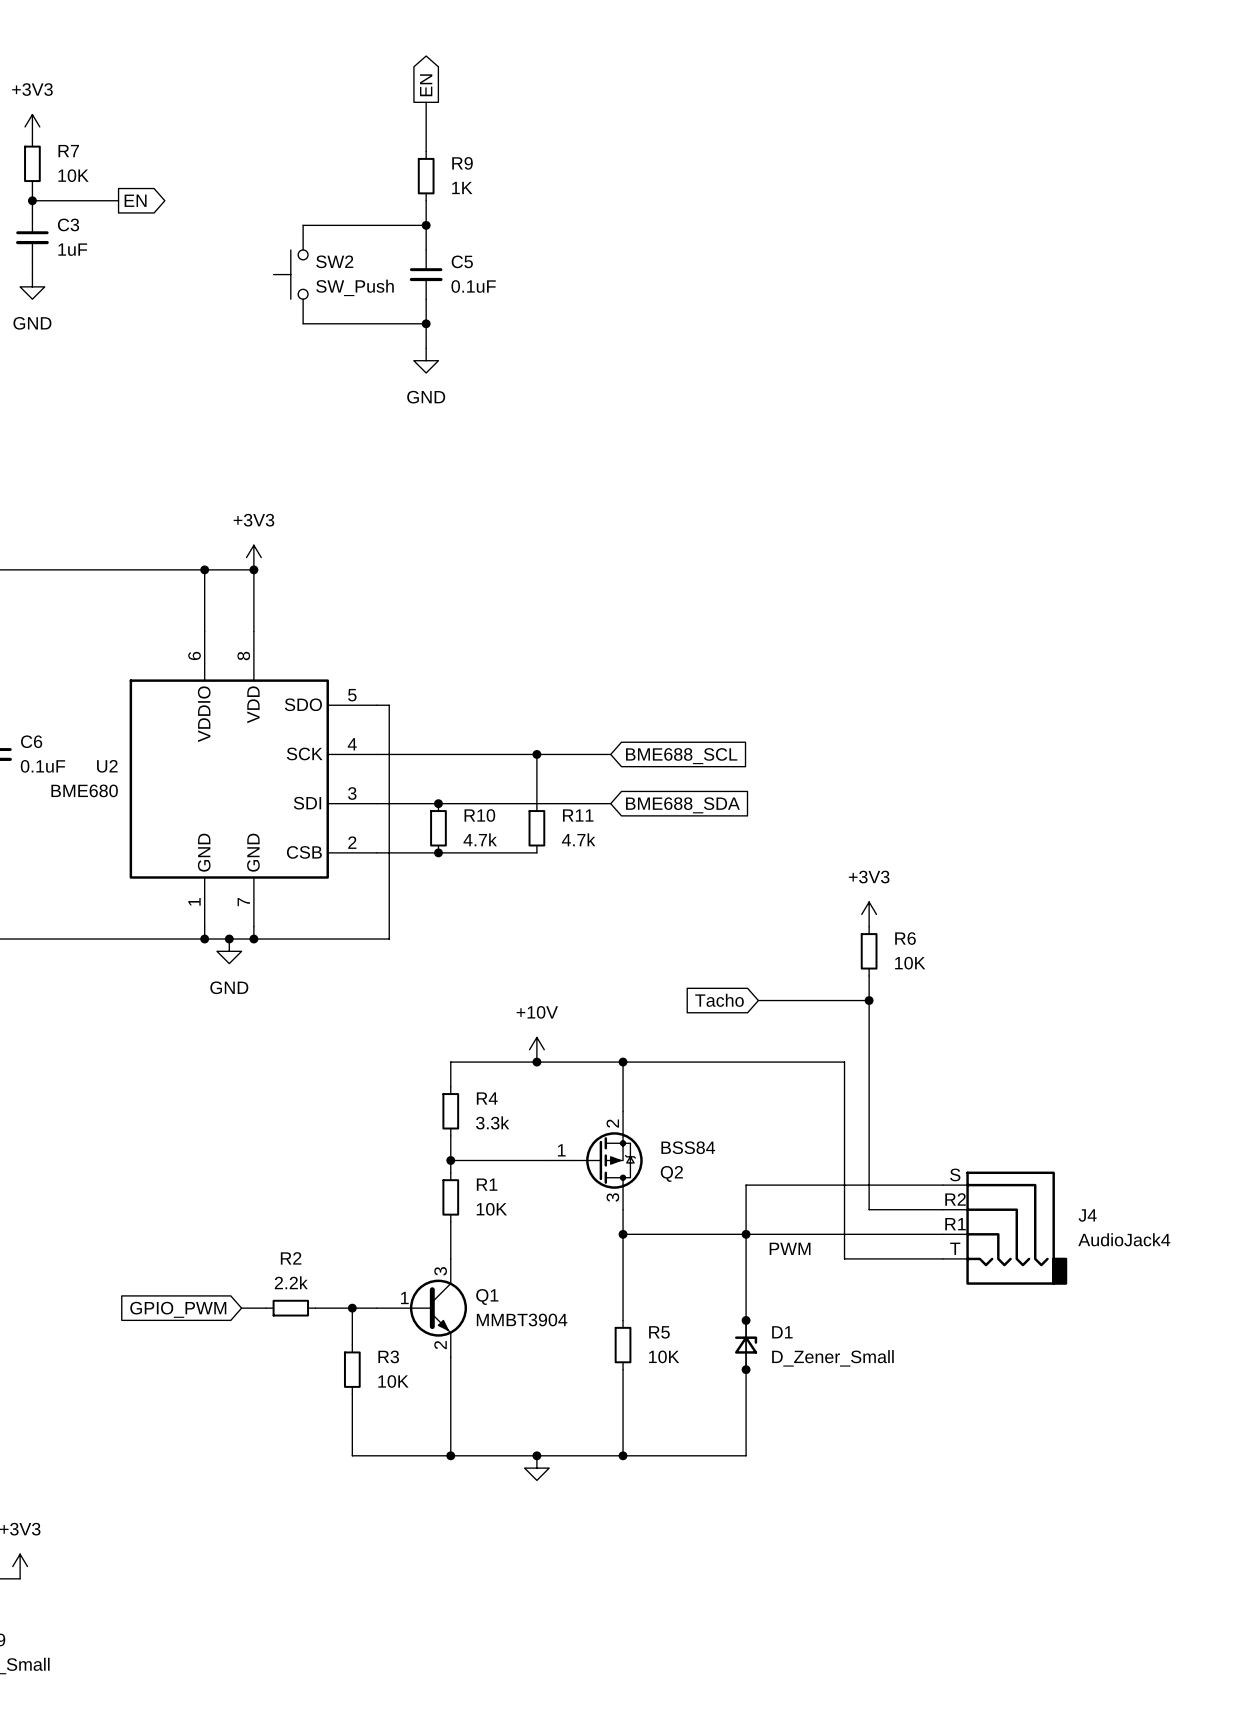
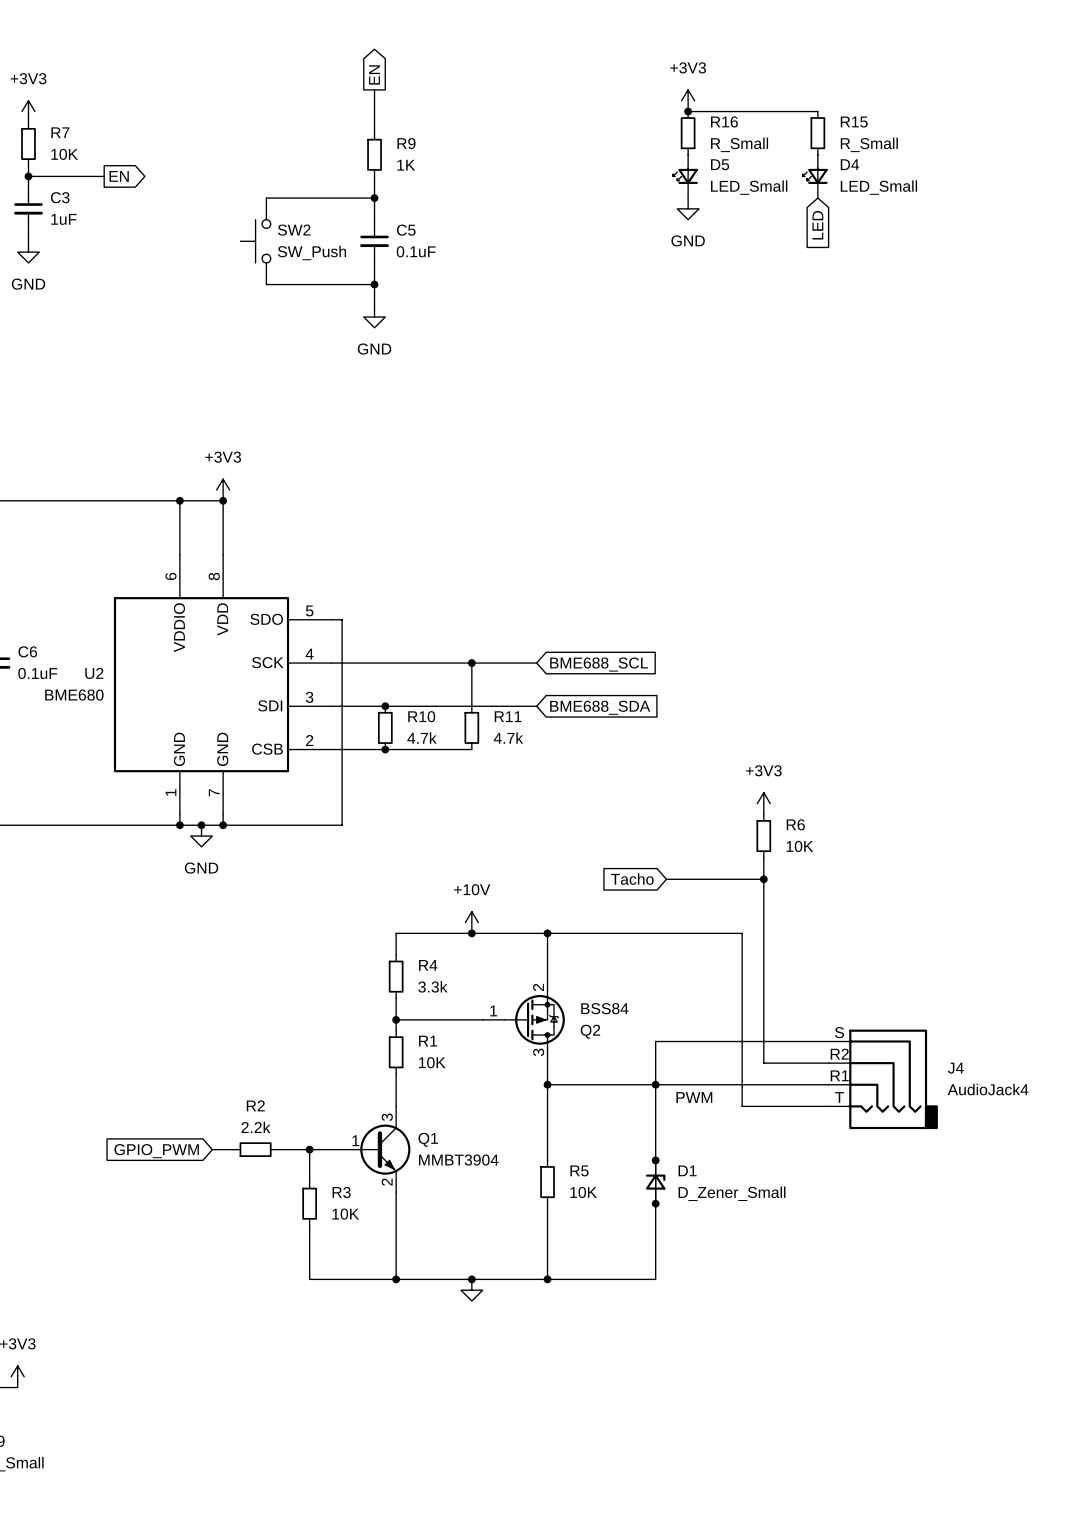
power symbol: none -> +3V3 (688, 100)
wire: none -> (688, 111) (817, 111)
junction: none -> (688, 111)
R16: none -> R_Small (688, 133)
R15: none -> R_Small (817, 133)
D5: none -> LED_Small (685, 176)
D4: none -> LED_Small (815, 176)
power symbol: none -> GND (688, 208)
global label: none -> LED (817, 225)

